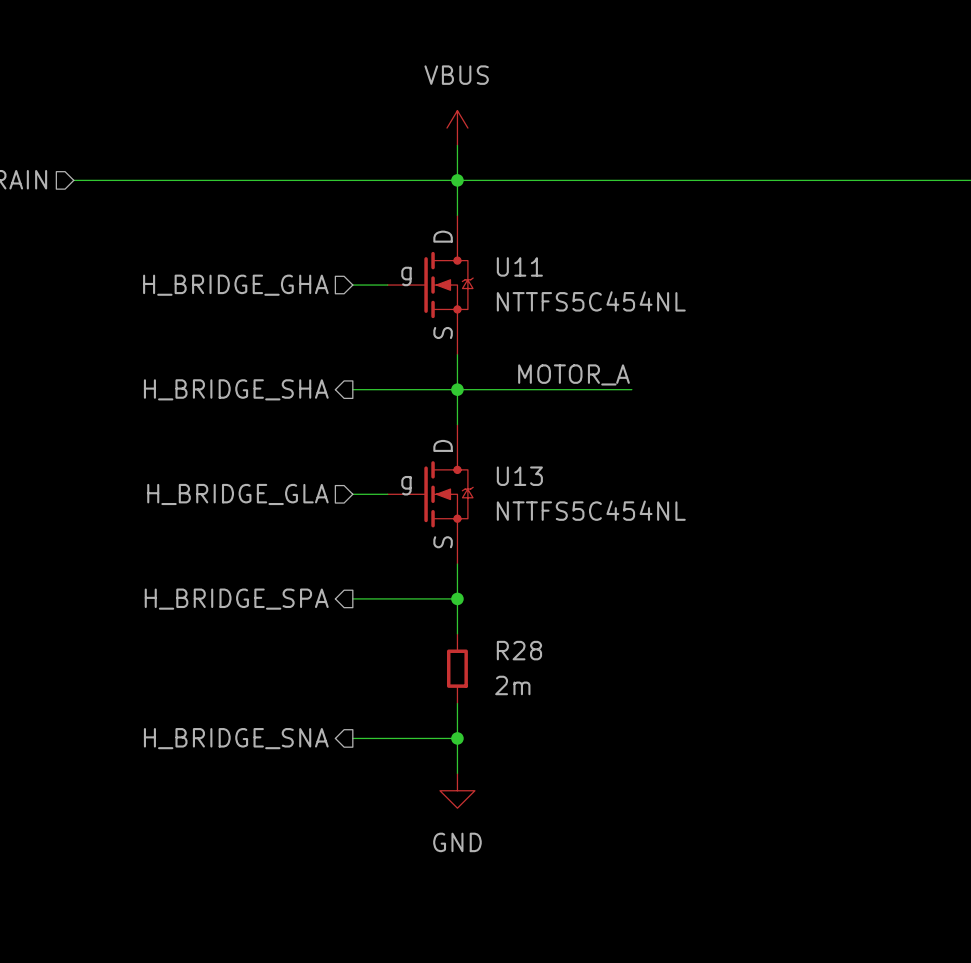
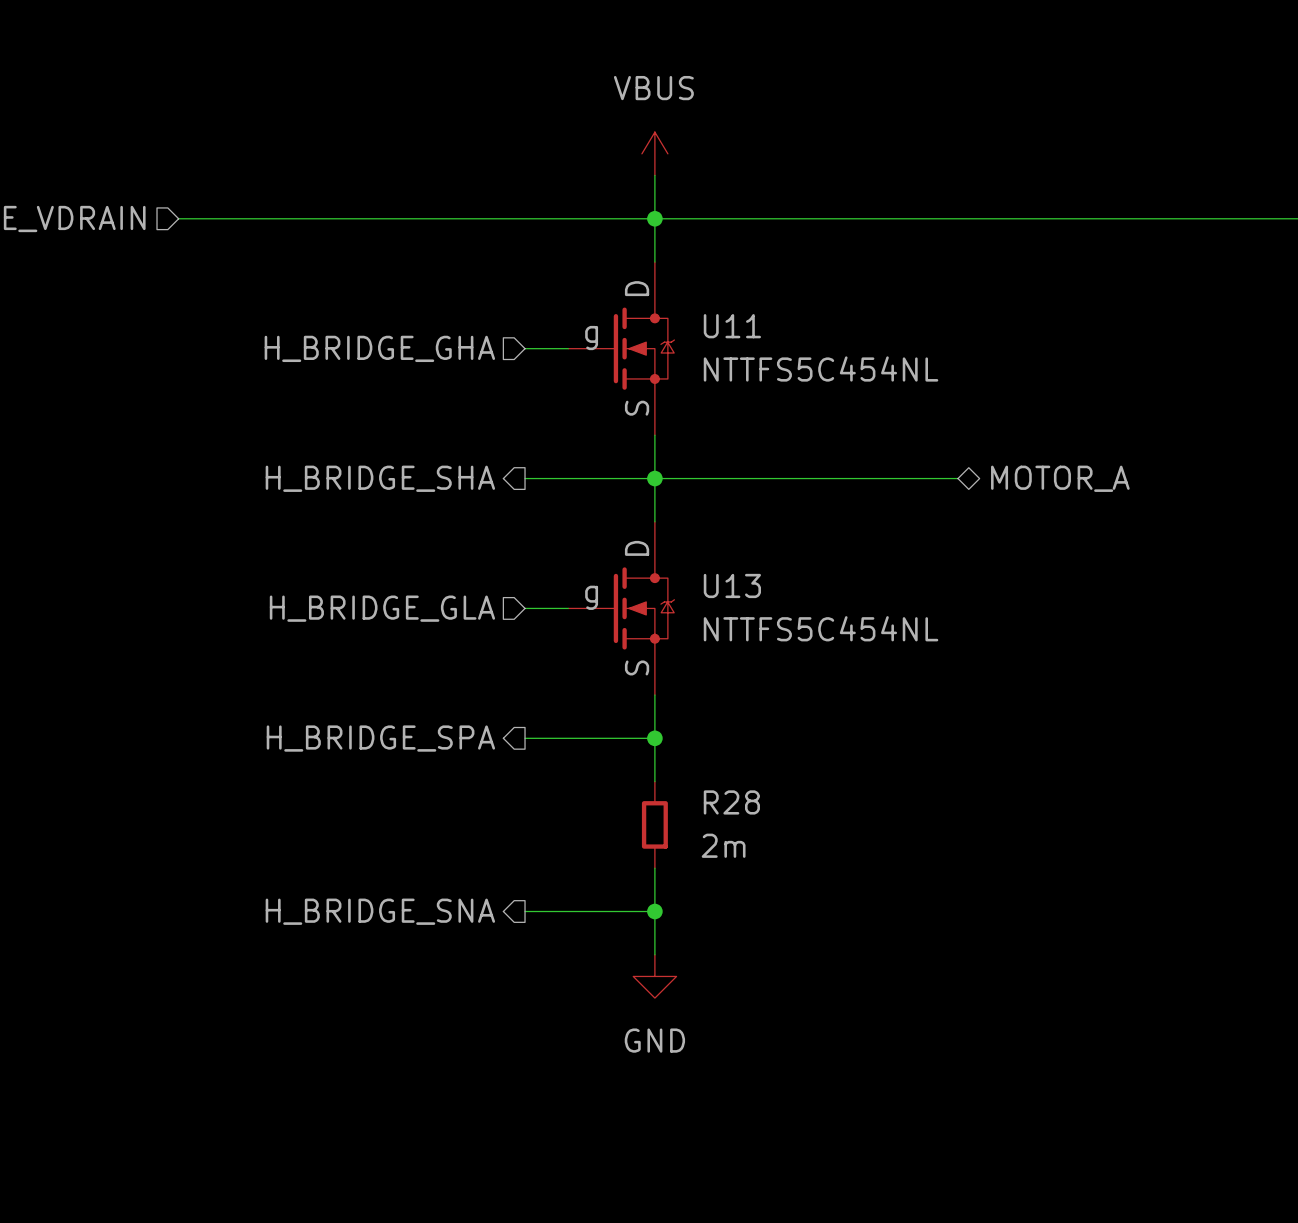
label: MOTOR_A (574, 374) -> none
wire: none -> (871, 478) (957, 478)
hierarchical label: none -> MOTOR_A (1060, 478)

